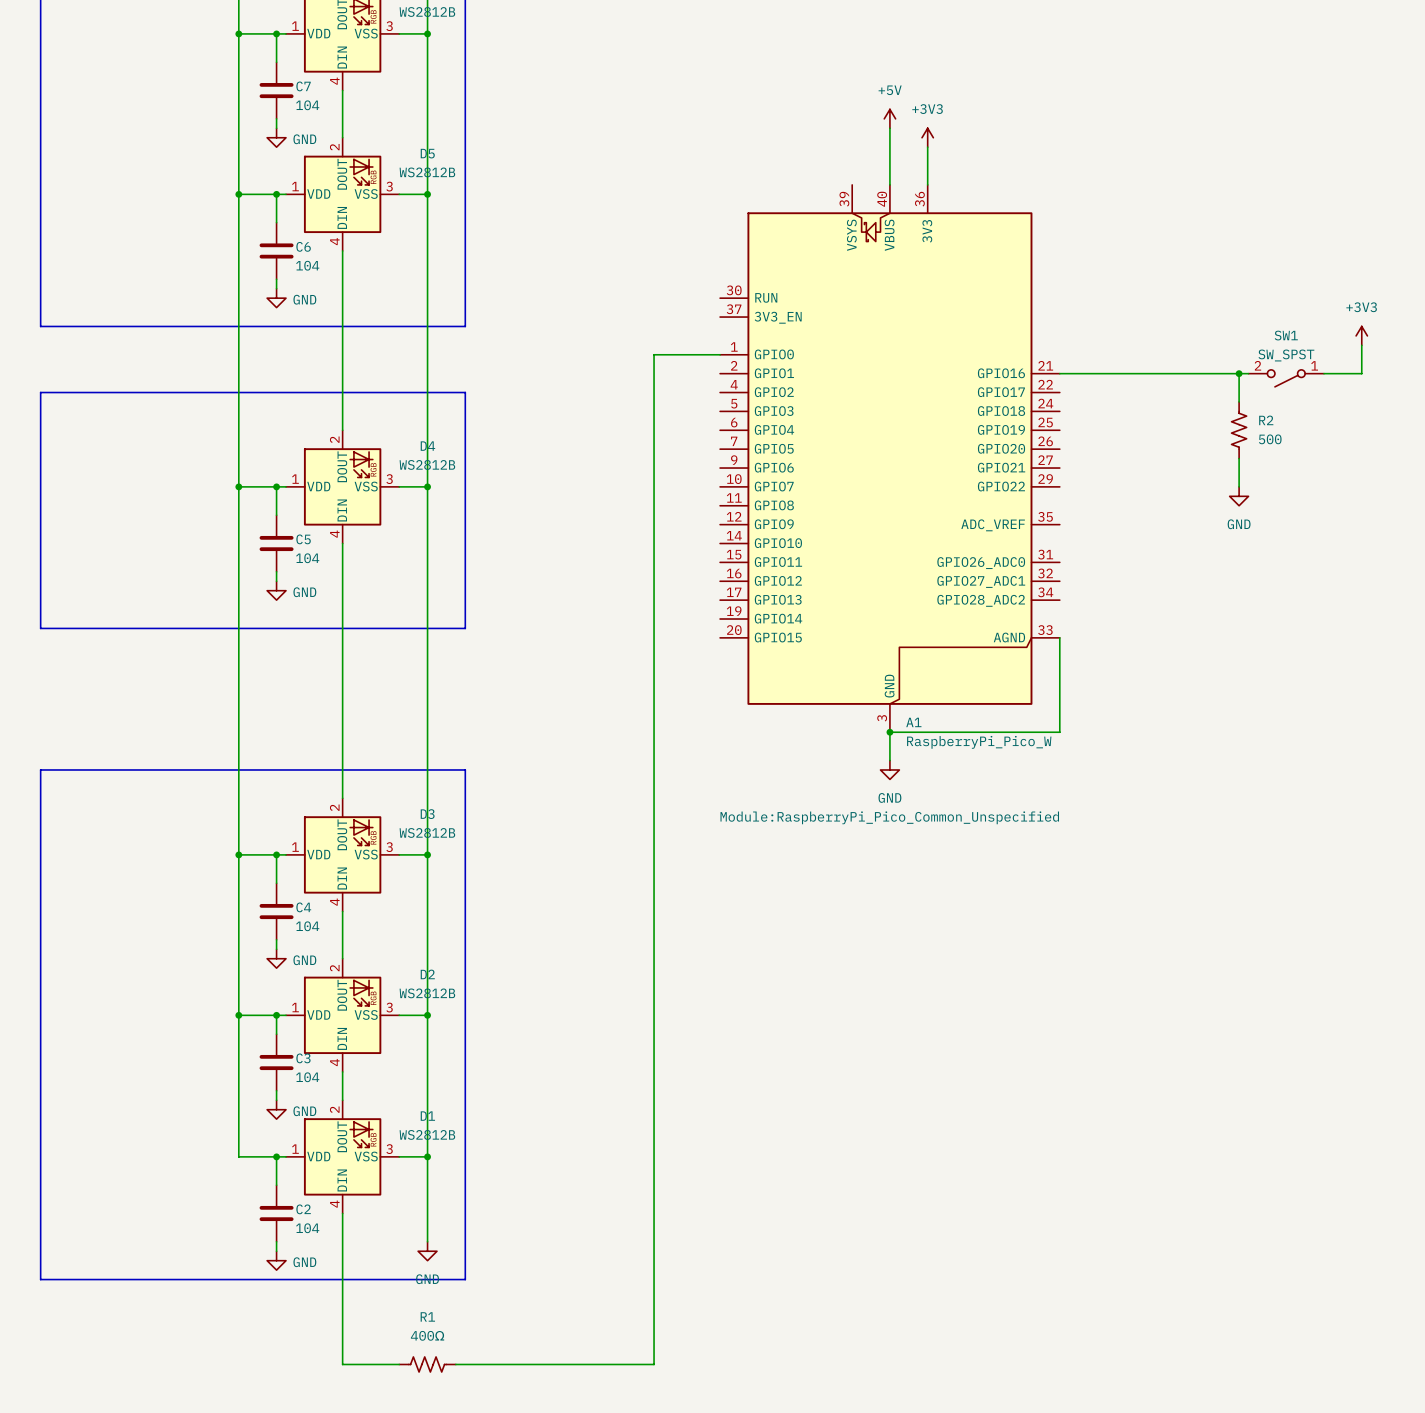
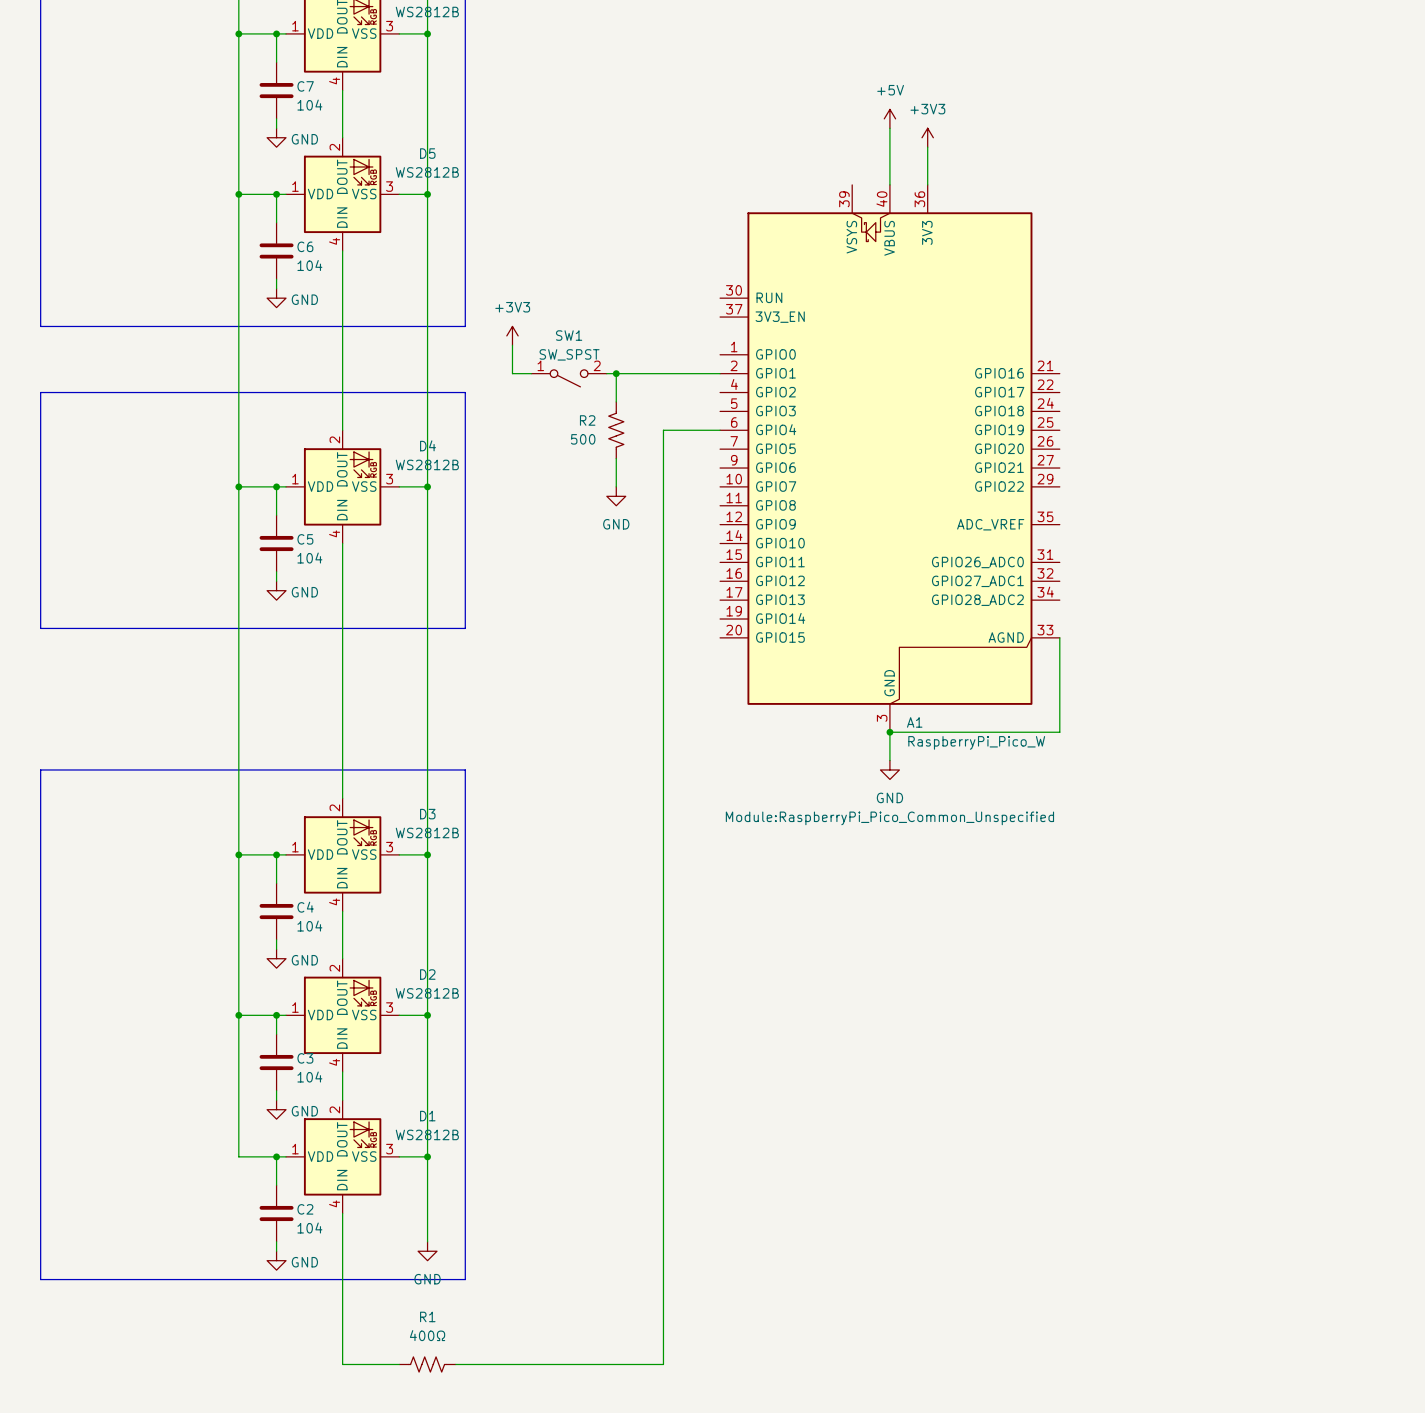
power symbol: none -> +3V3 (512, 335)
power symbol: +3V3 (1361, 335) -> none
wire: none -> (512, 345) (512, 373) (531, 373)
wire: (1361, 345) (1361, 373) (1324, 373) -> none
wire: (720, 354) (654, 354) (654, 1364) -> (720, 430) (663, 430) (663, 1364) (654, 1364)
wire: none -> (606, 373) (720, 373)
wire: none -> (616, 373) (616, 401)
junction: none -> (616, 373)
wire: (1059, 373) (1248, 373) -> none
wire: (1239, 373) (1239, 401) -> none
junction: (1239, 373) -> none
SW1 flip: as is (1286, 378) -> left-right (569, 378)
SW1 position: (1286, 378) -> (569, 378)
R2 flip: as is (1239, 430) -> left-right (616, 430)
R2 position: (1239, 430) -> (616, 430)
wire: none -> (616, 458) (616, 486)
wire: (1239, 458) (1239, 486) -> none
power symbol: none -> GND (616, 496)
power symbol: GND (1239, 496) -> none

